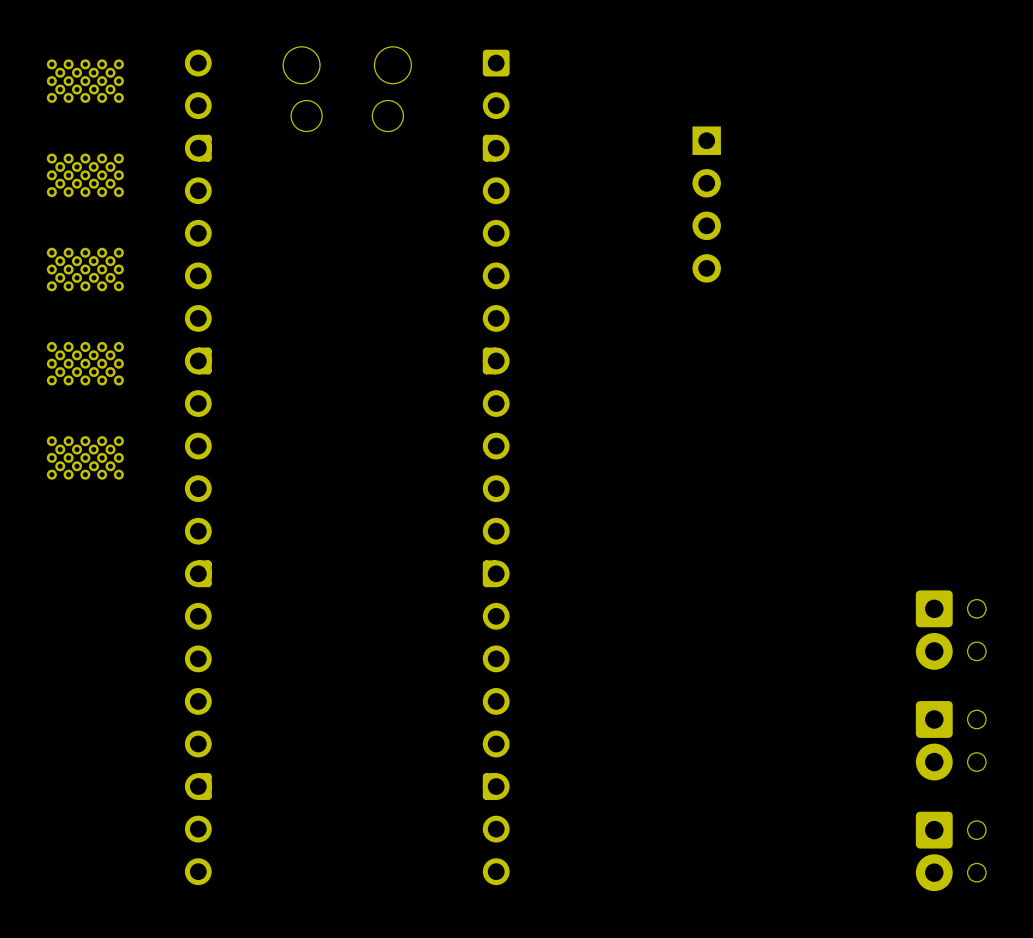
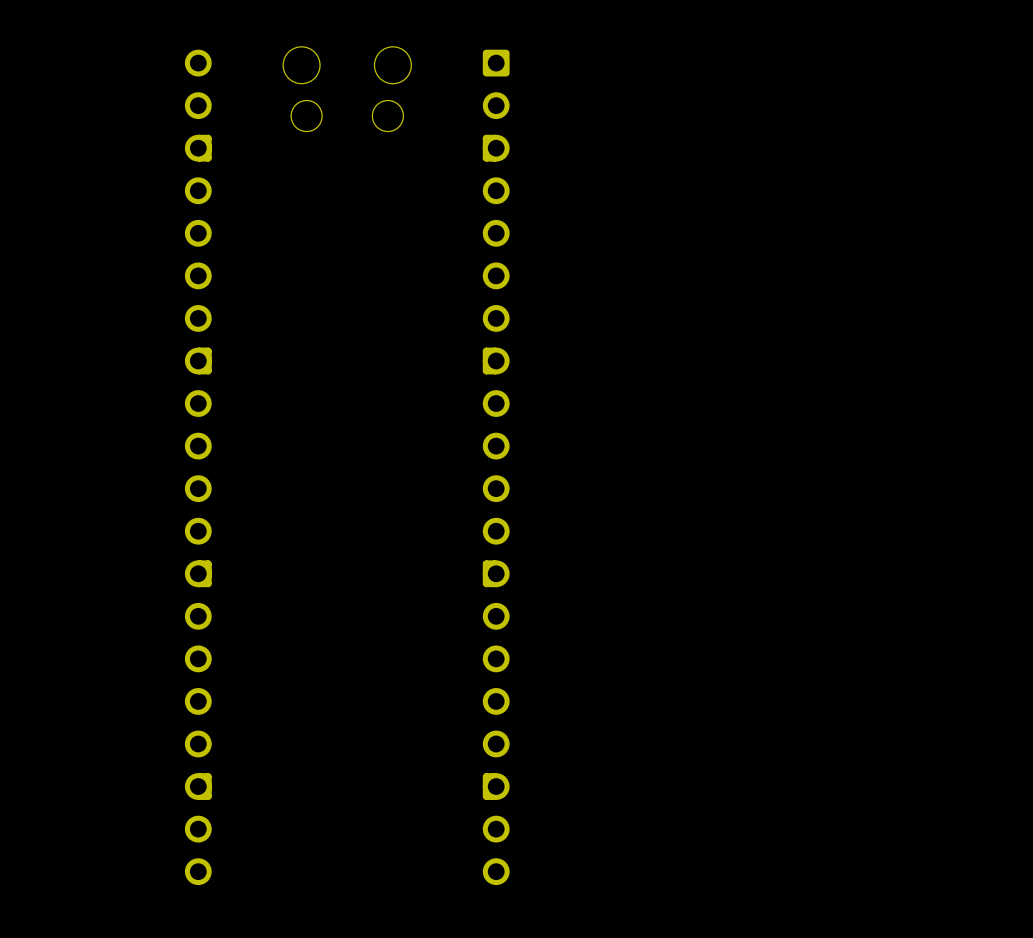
part: (85, 81) -> none
part: (85, 175) -> none
part: (706, 204) -> none
part: (85, 269) -> none
part: (85, 363) -> none
part: (85, 457) -> none
part: (950, 630) -> none
part: (950, 740) -> none
part: (950, 851) -> none

